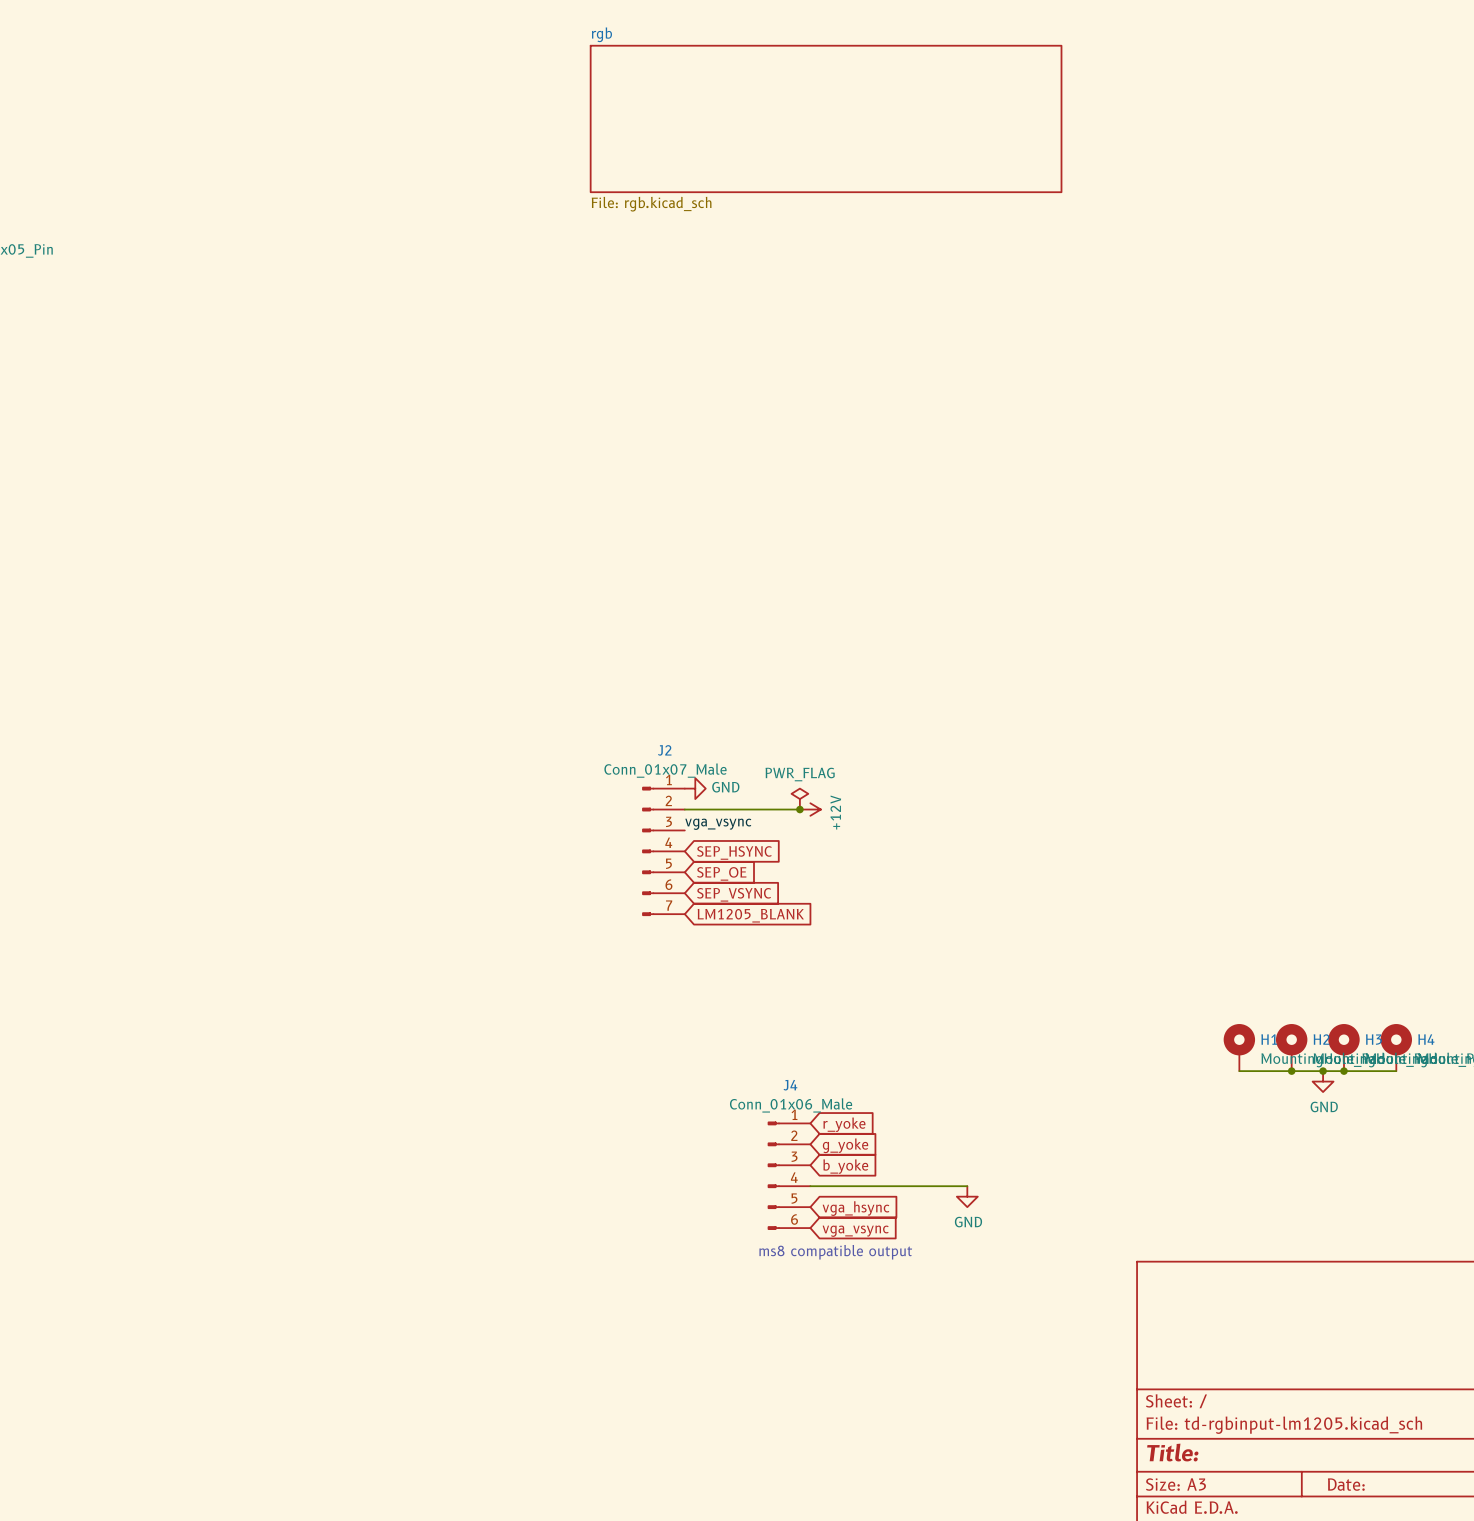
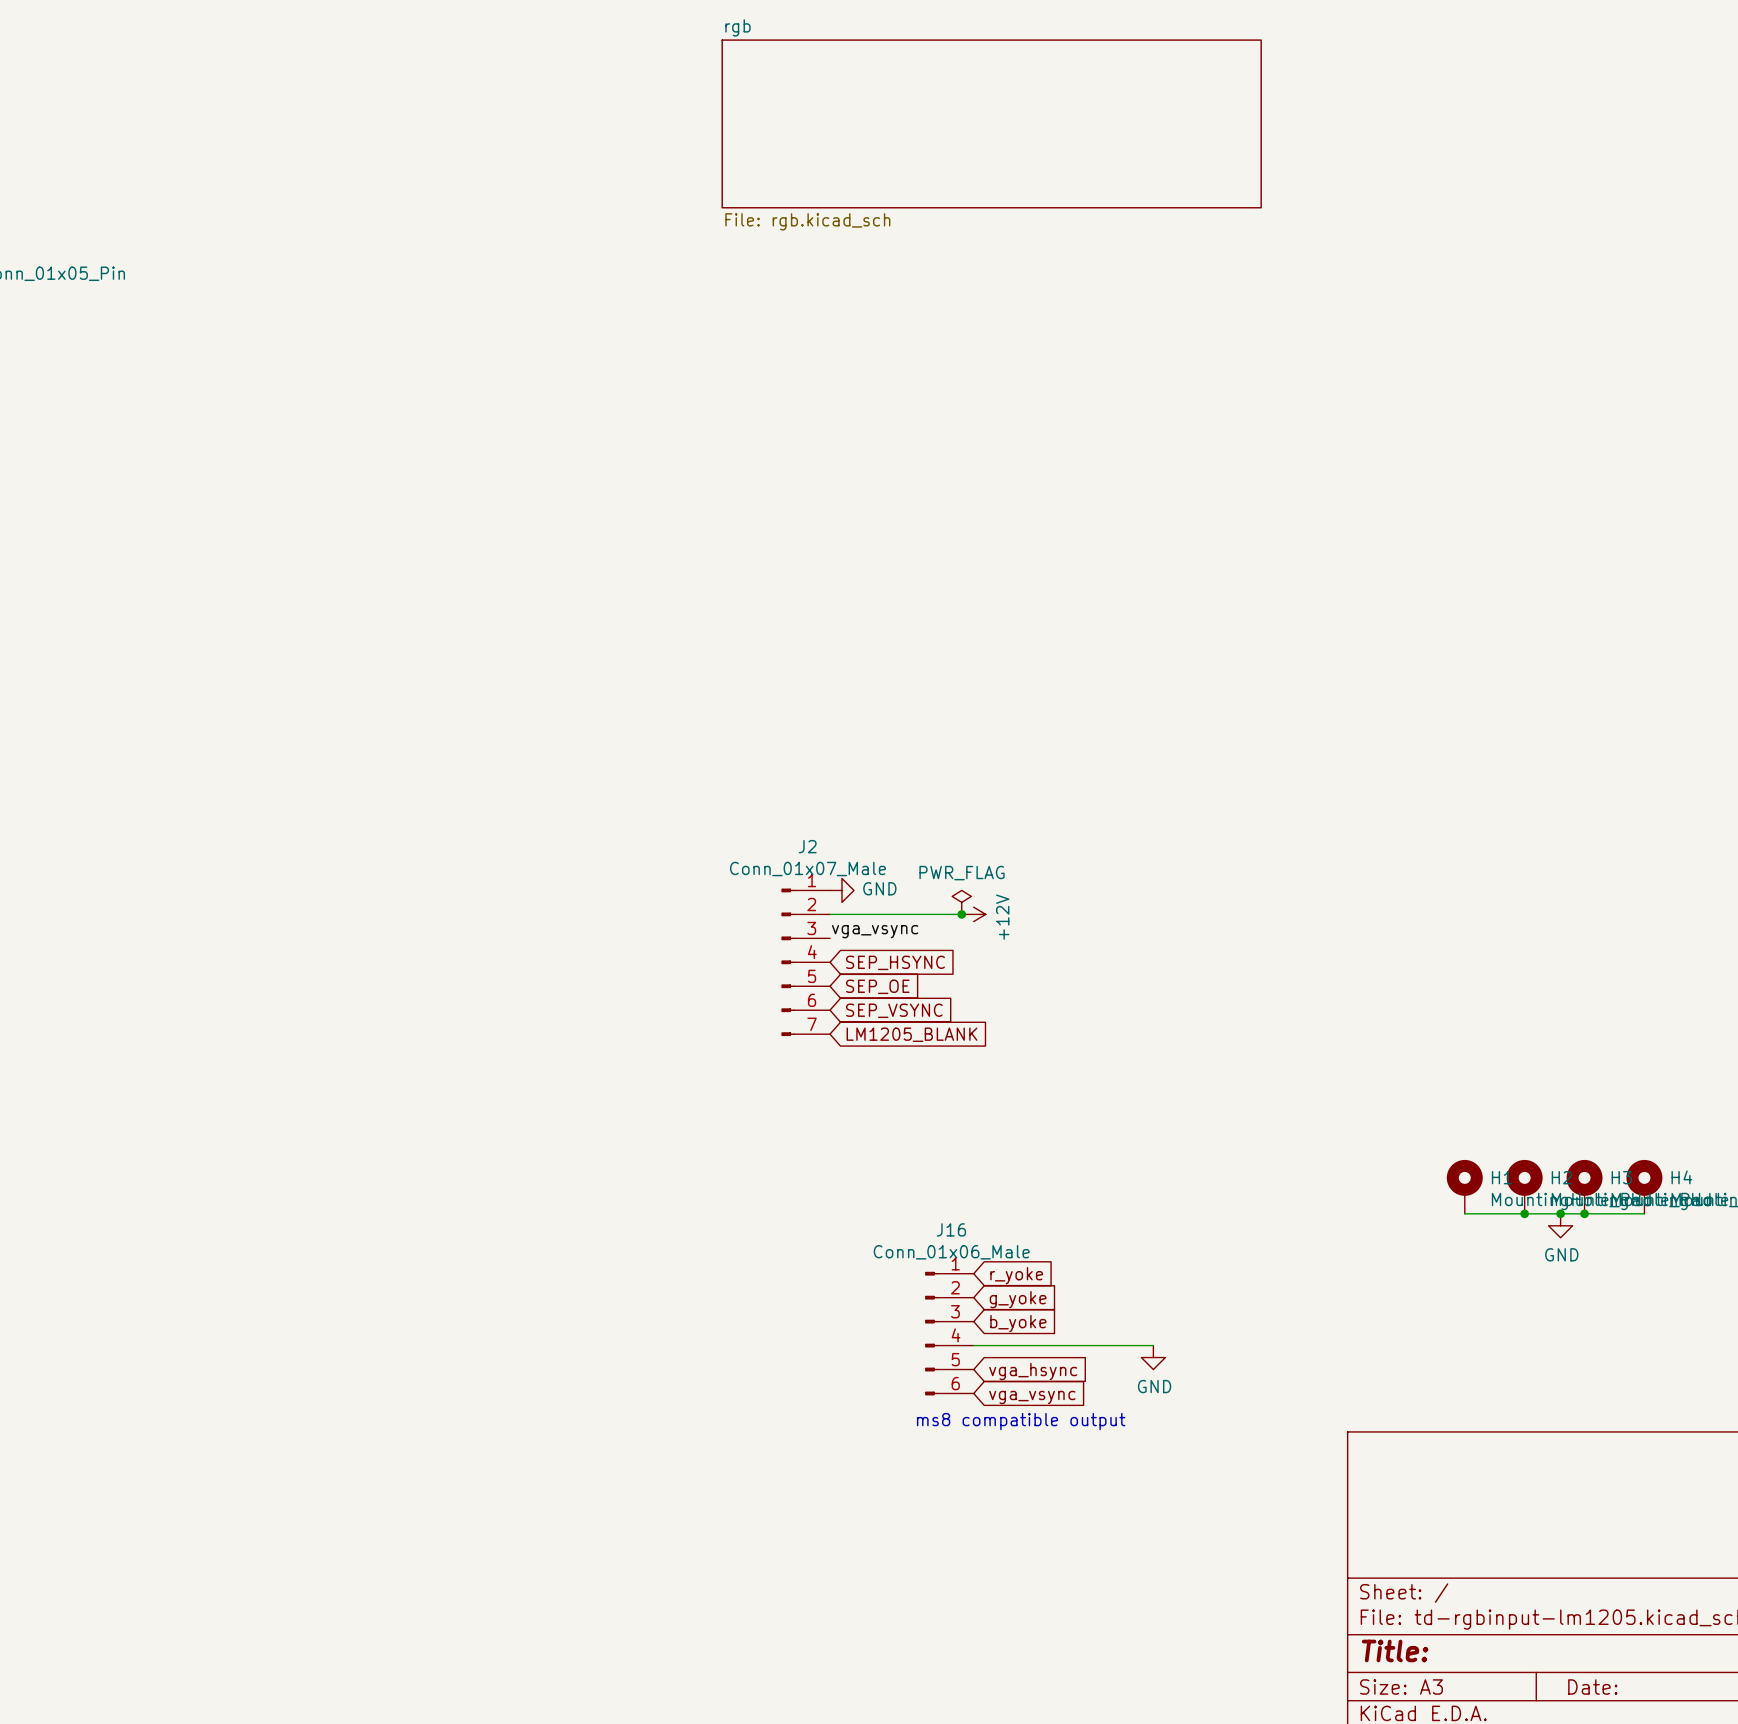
J4 name: J4 (790, 1085) -> J16 (951, 1229)

